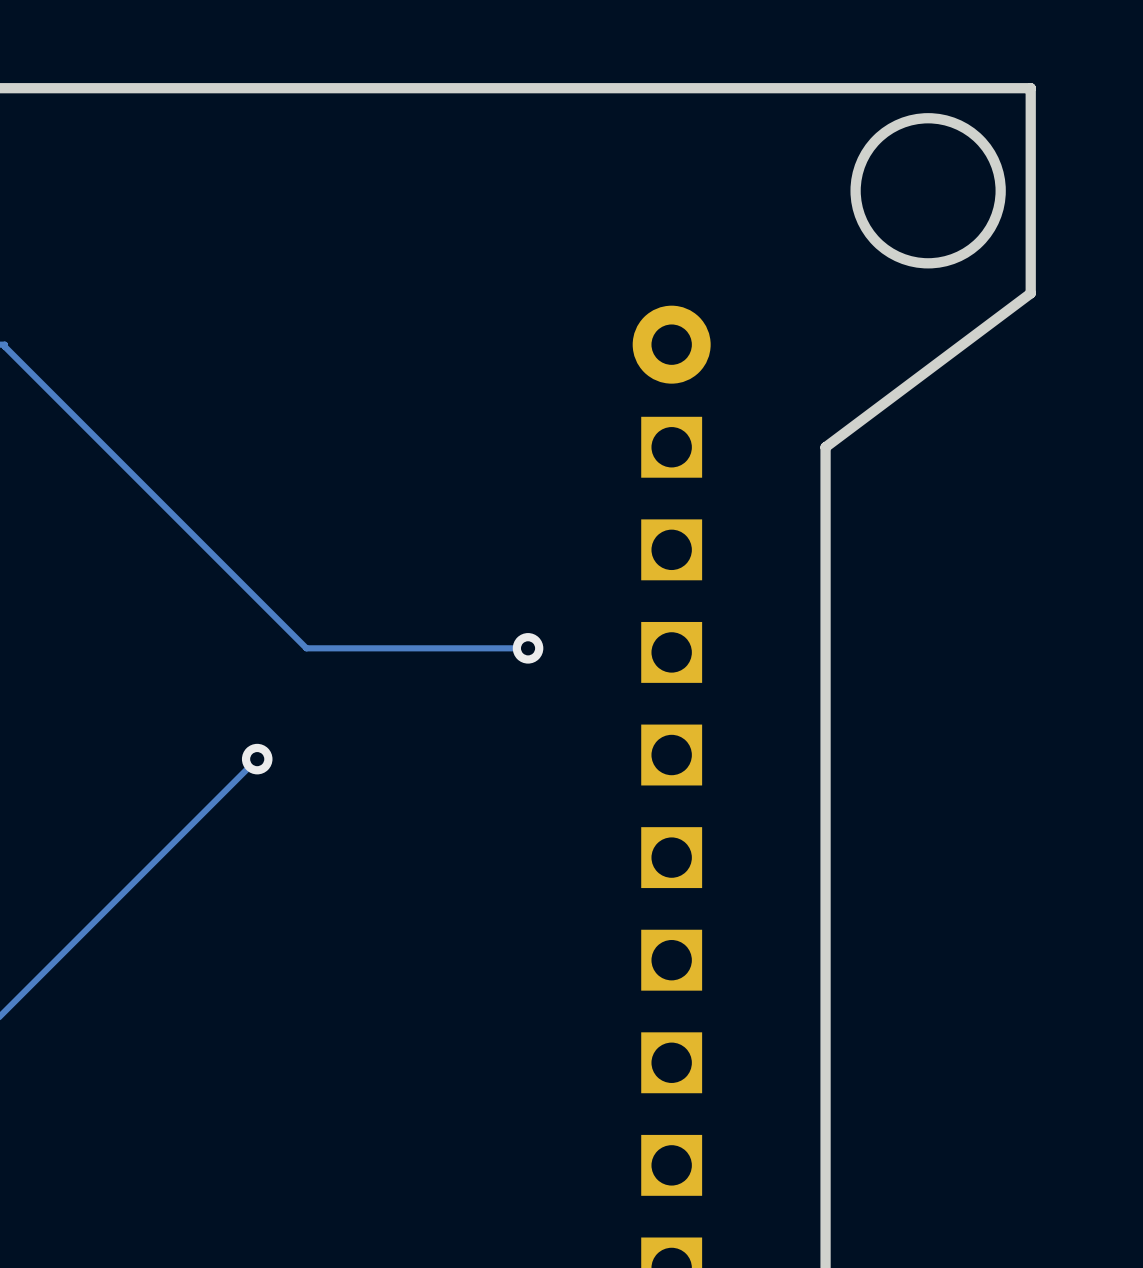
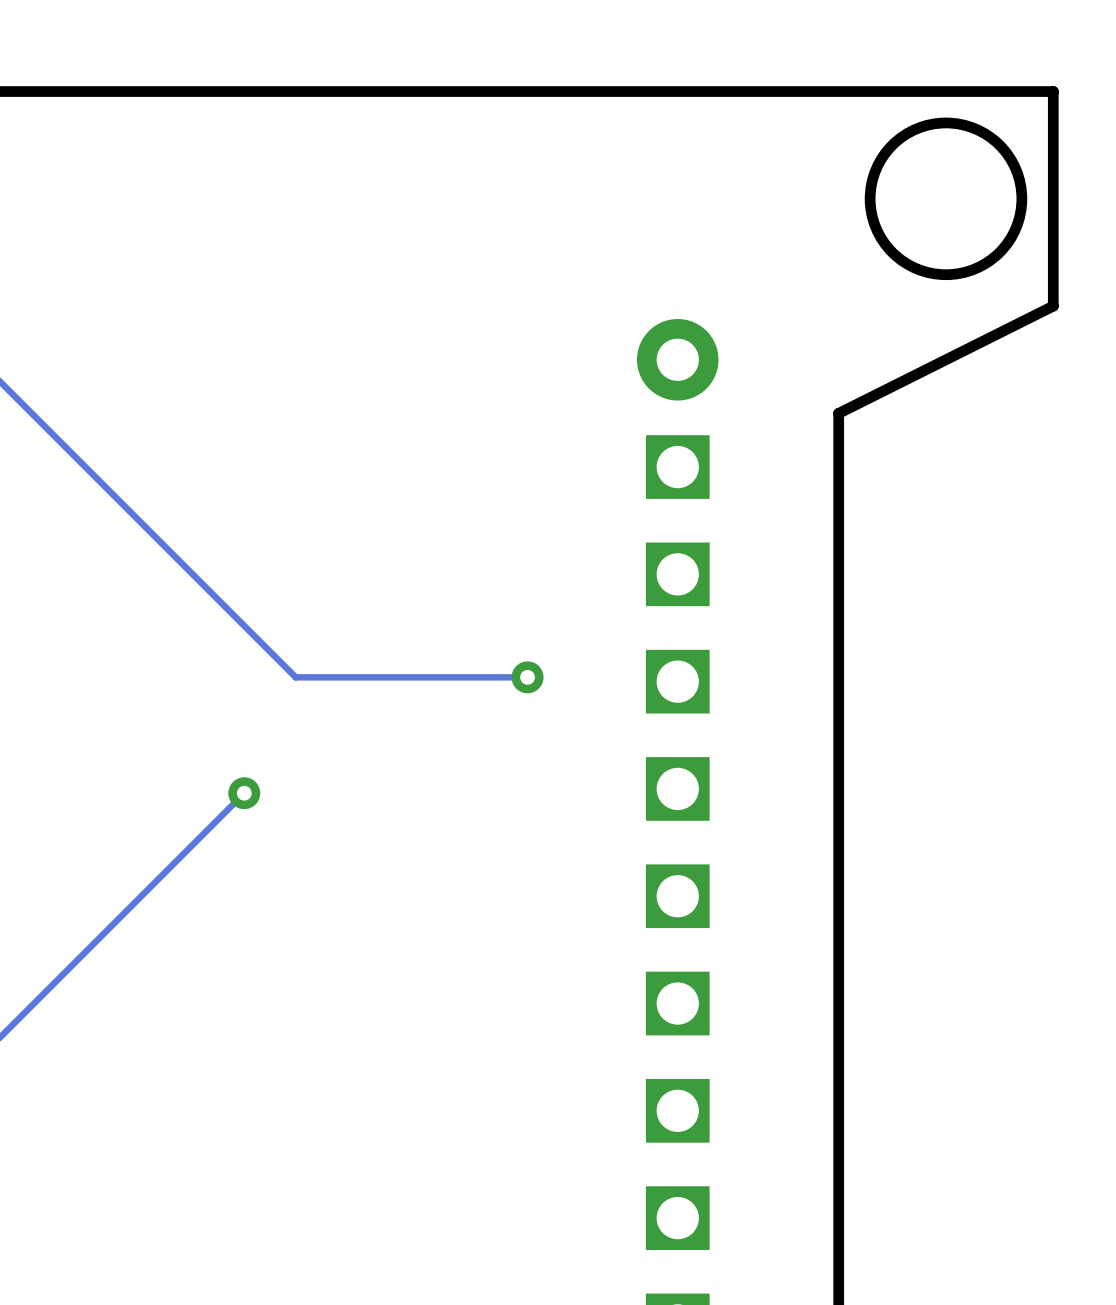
board edge: (1030, 293) (825, 447) -> (1053, 306) (838, 413) (838, 467)

